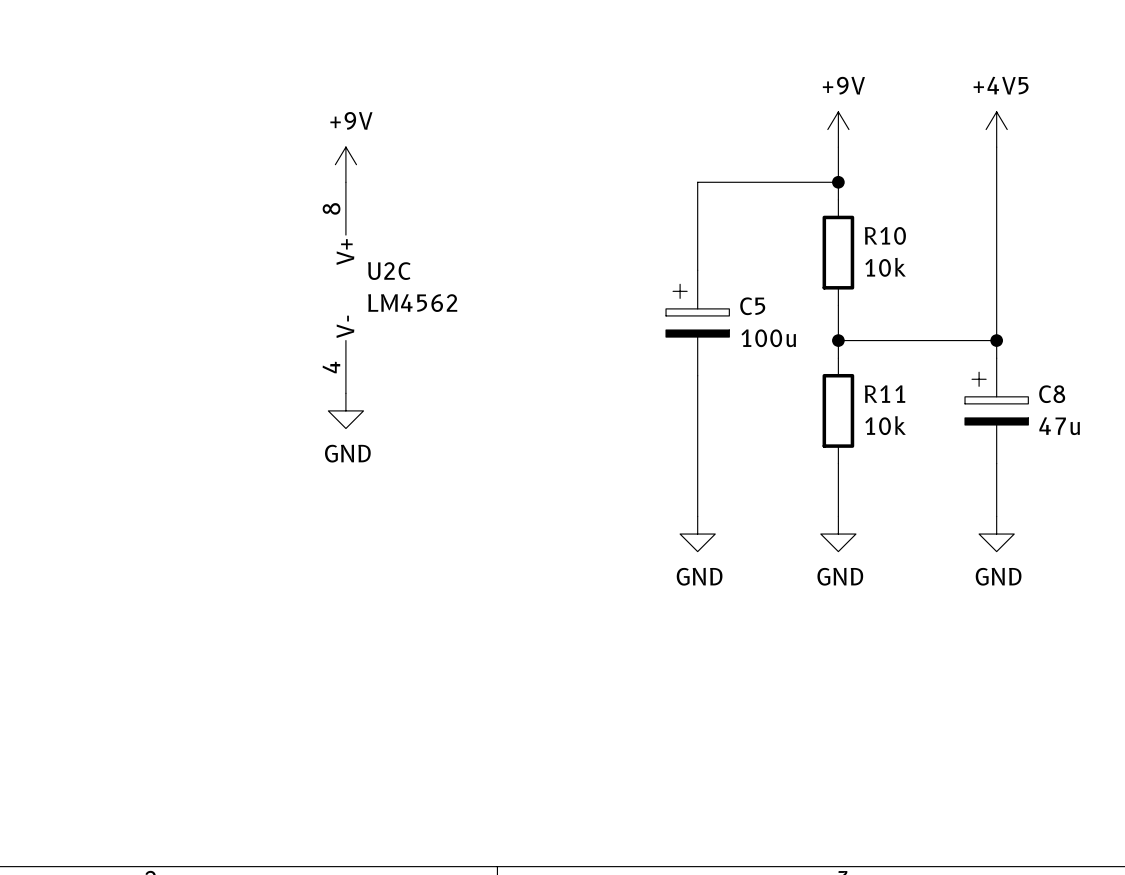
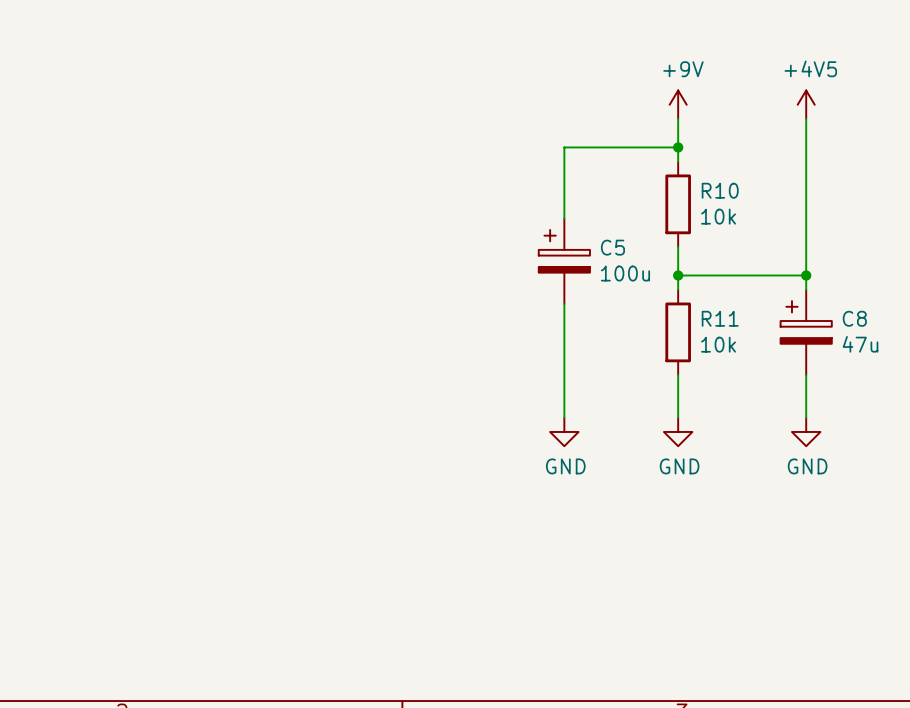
power symbol: +9V (345, 164) -> none
U2C: LM4562 (345, 287) -> none
power symbol: GND (345, 410) -> none

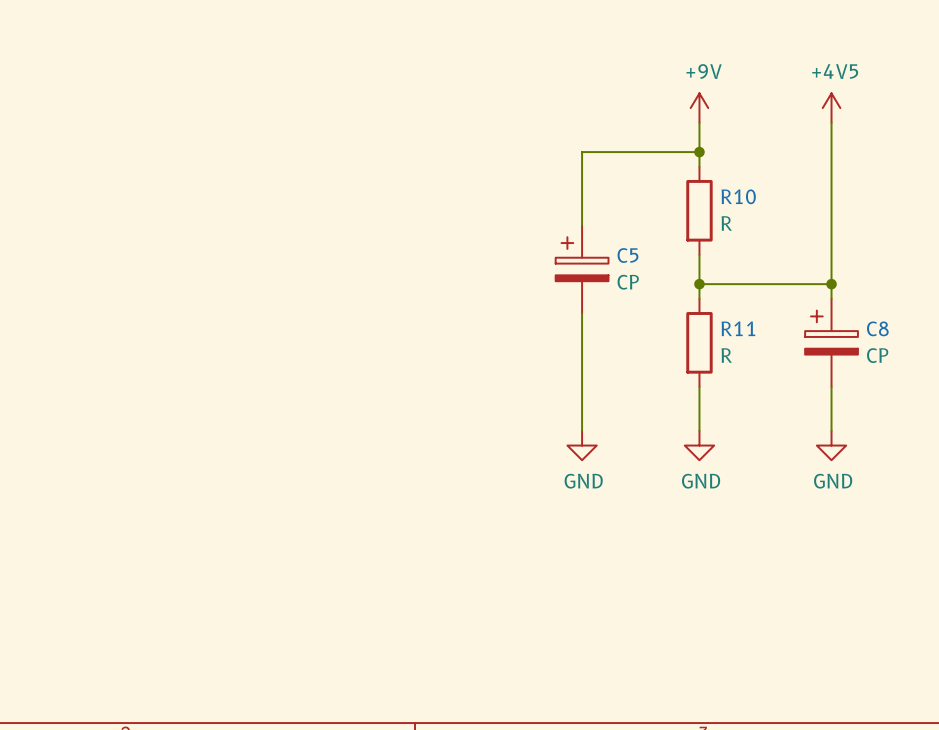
R10 value: 10k (718, 216) -> R (726, 223)
C5 value: 100u (625, 273) -> CP (628, 282)
R11 value: 10k (718, 344) -> R (726, 355)
C8 value: 47u (860, 344) -> CP (877, 355)

